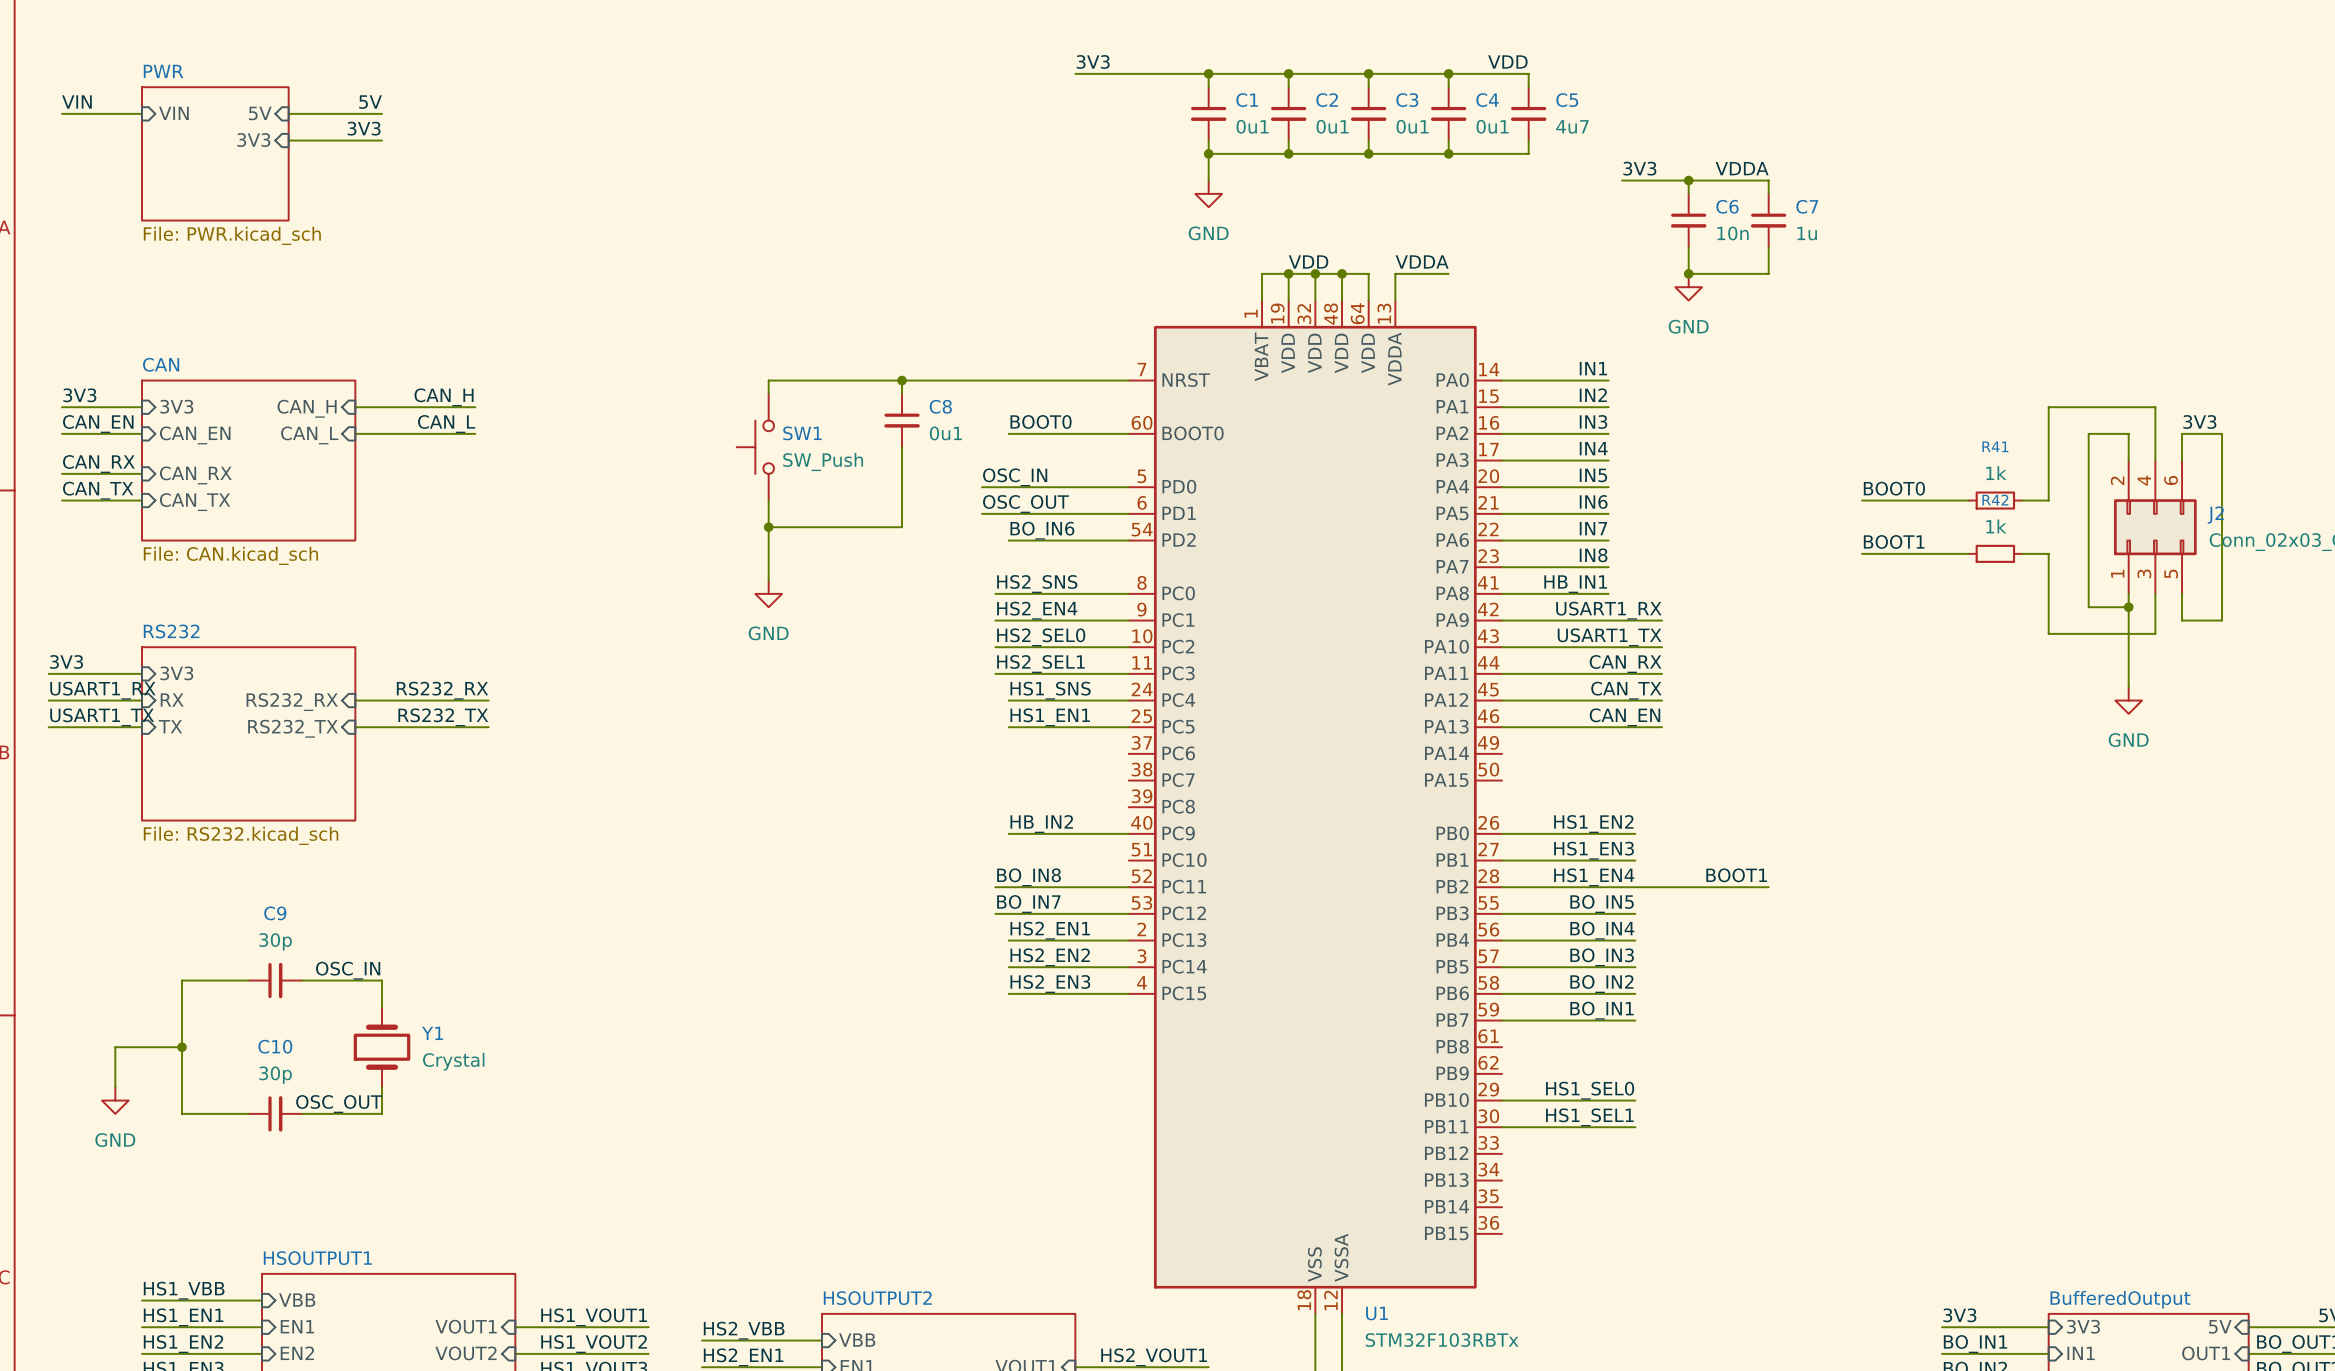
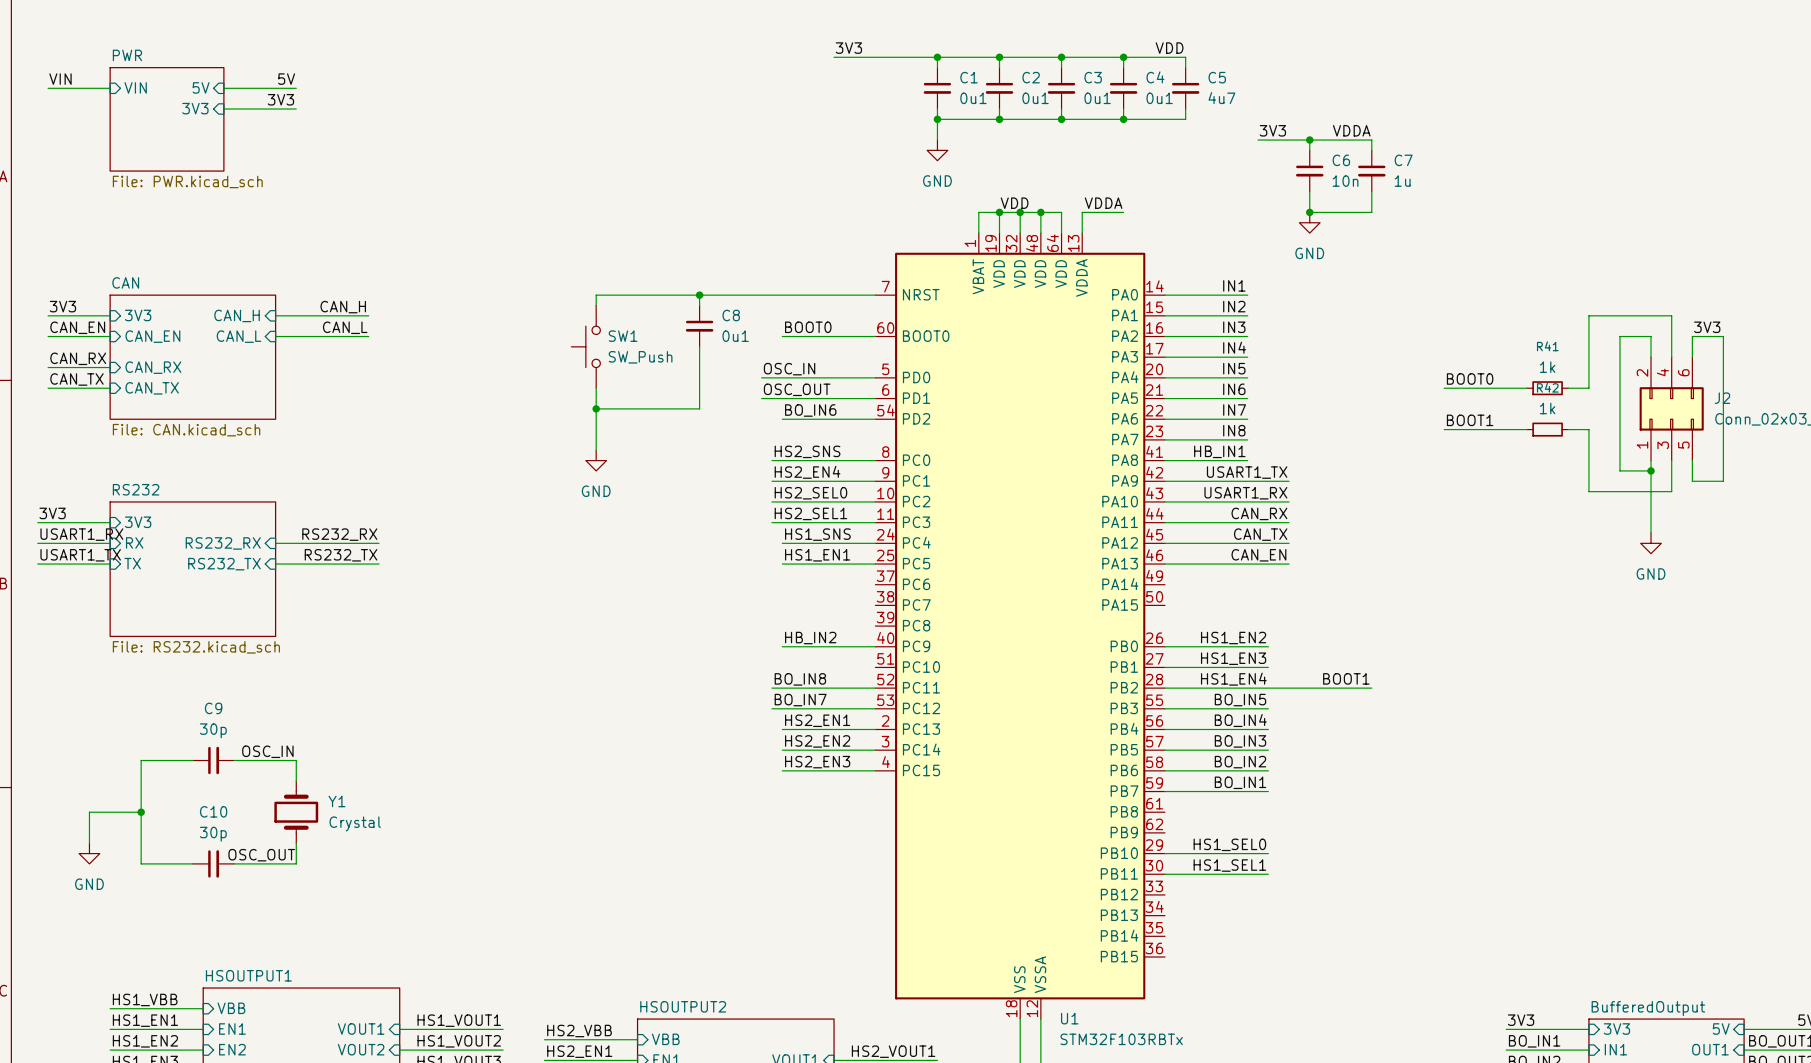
label: USART1_RX (1608, 610) -> USART1_TX (1247, 472)
label: USART1_TX (1609, 637) -> USART1_RX (1245, 493)

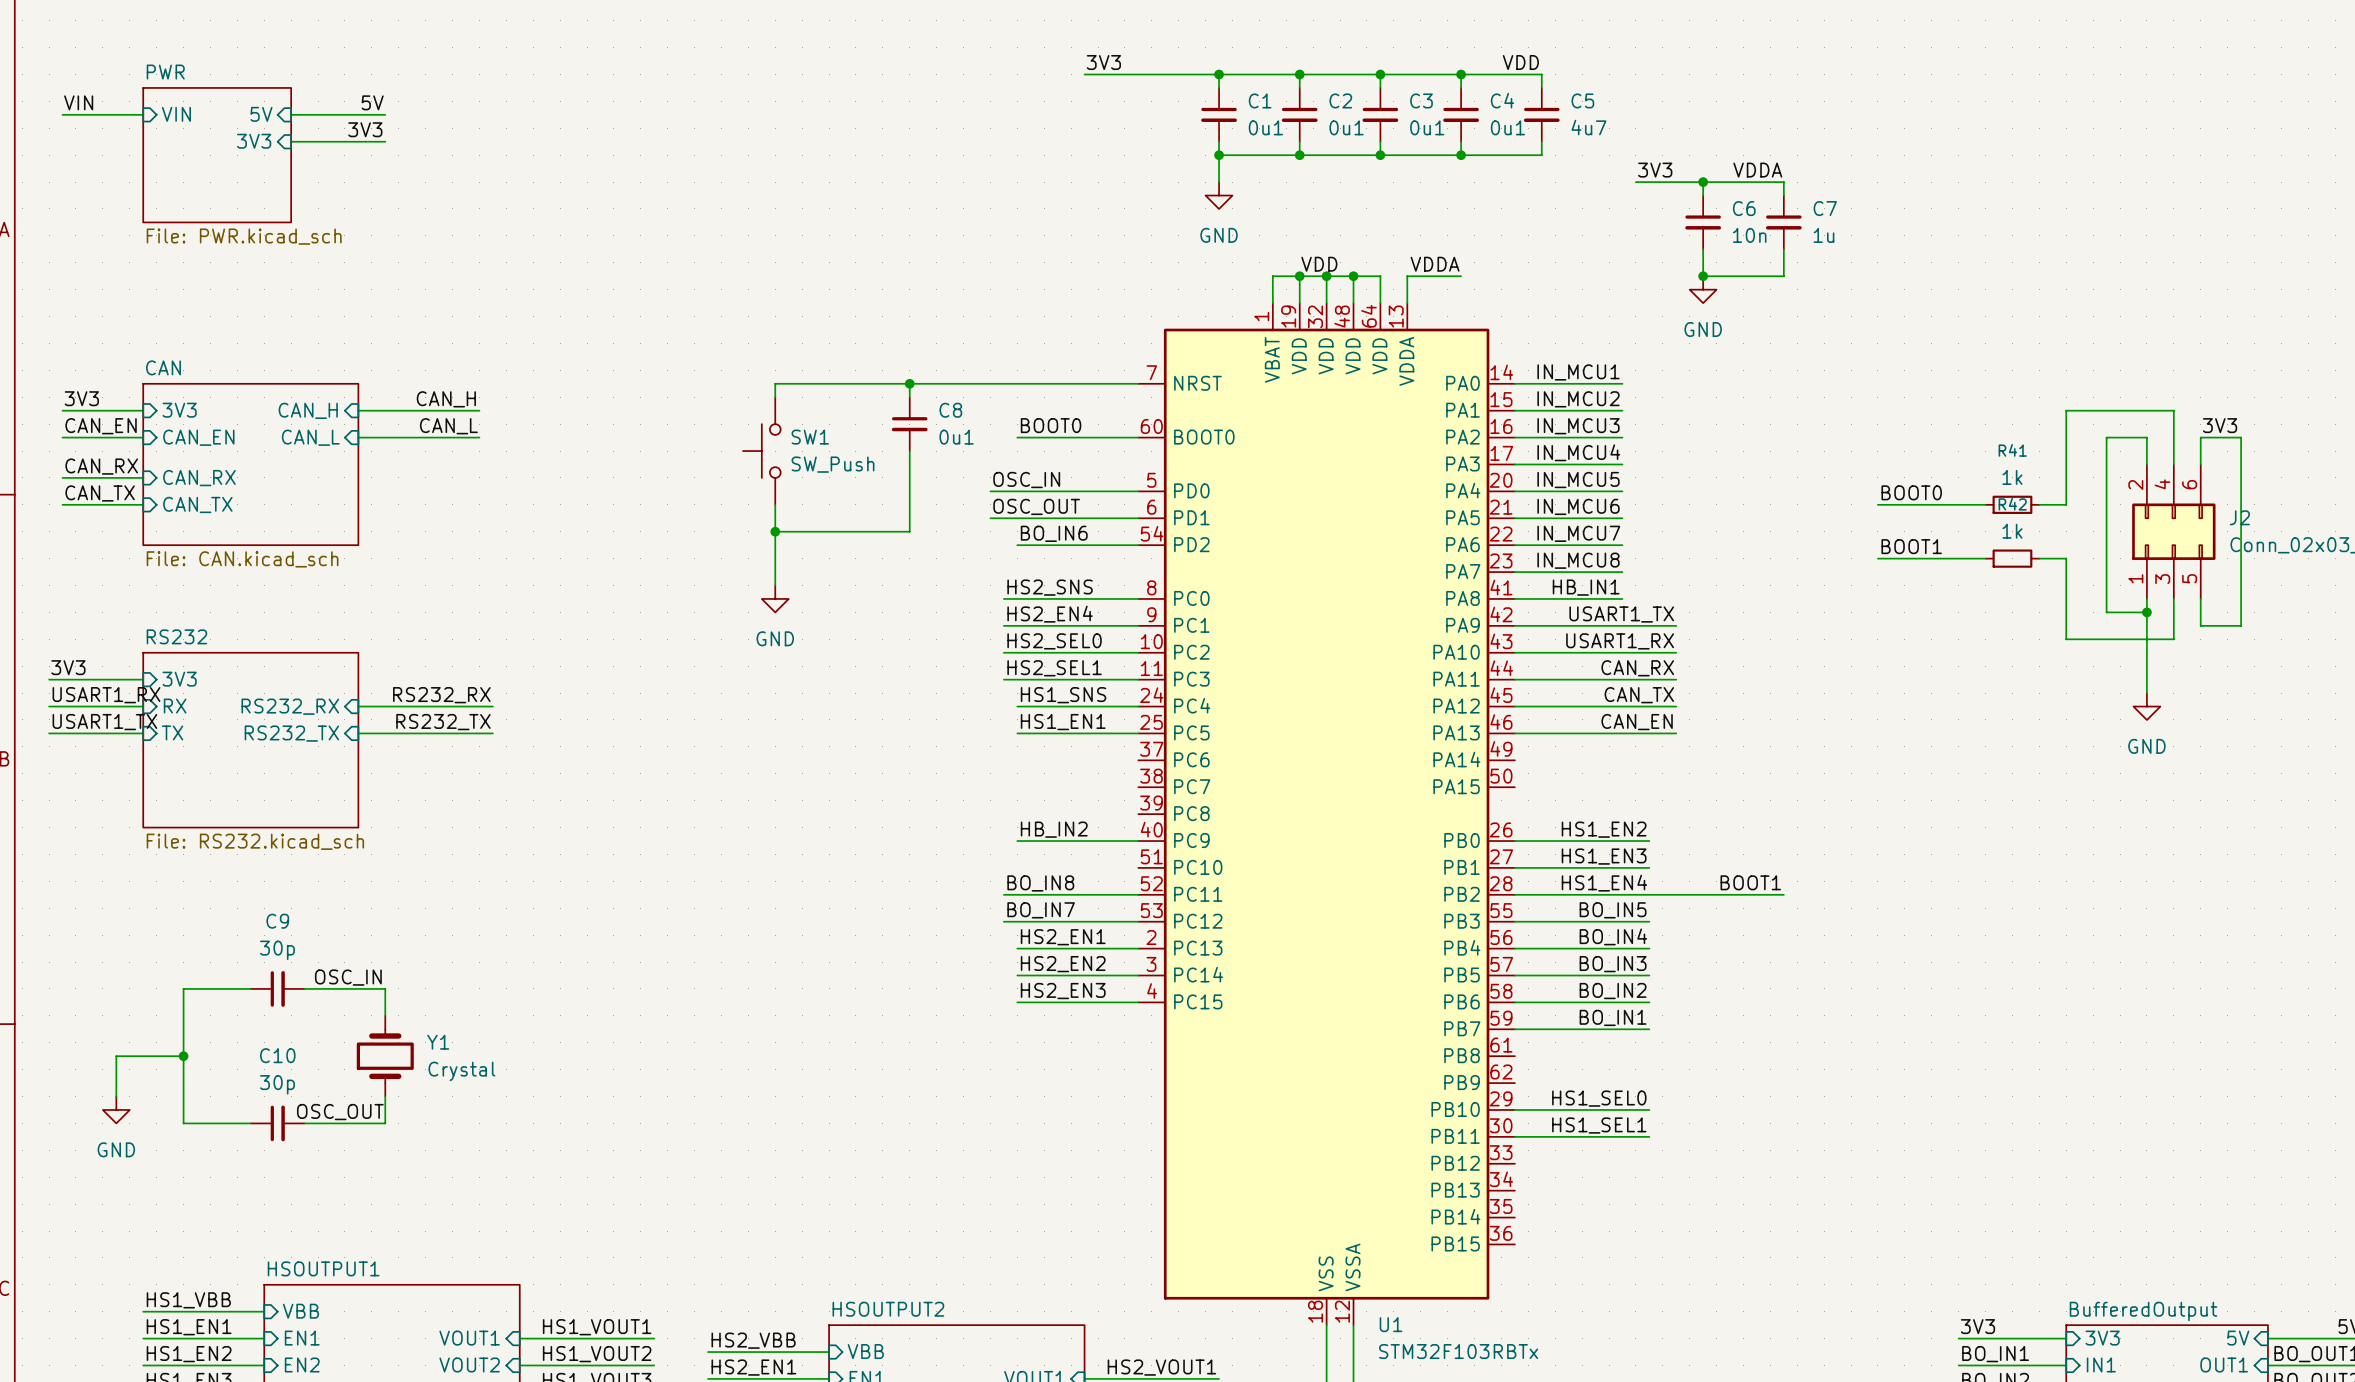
label: IN1 (1234, 285) -> IN_MCU1 (1578, 372)
label: IN2 (1234, 306) -> IN_MCU2 (1578, 399)
label: IN3 (1234, 327) -> IN_MCU3 (1578, 426)
label: IN4 (1234, 347) -> IN_MCU4 (1578, 452)
label: IN5 (1234, 368) -> IN_MCU5 (1578, 480)
label: IN6 (1234, 389) -> IN_MCU6 (1578, 506)
label: IN7 (1234, 410) -> IN_MCU7 (1578, 533)
label: IN8 (1234, 430) -> IN_MCU8 (1578, 560)

